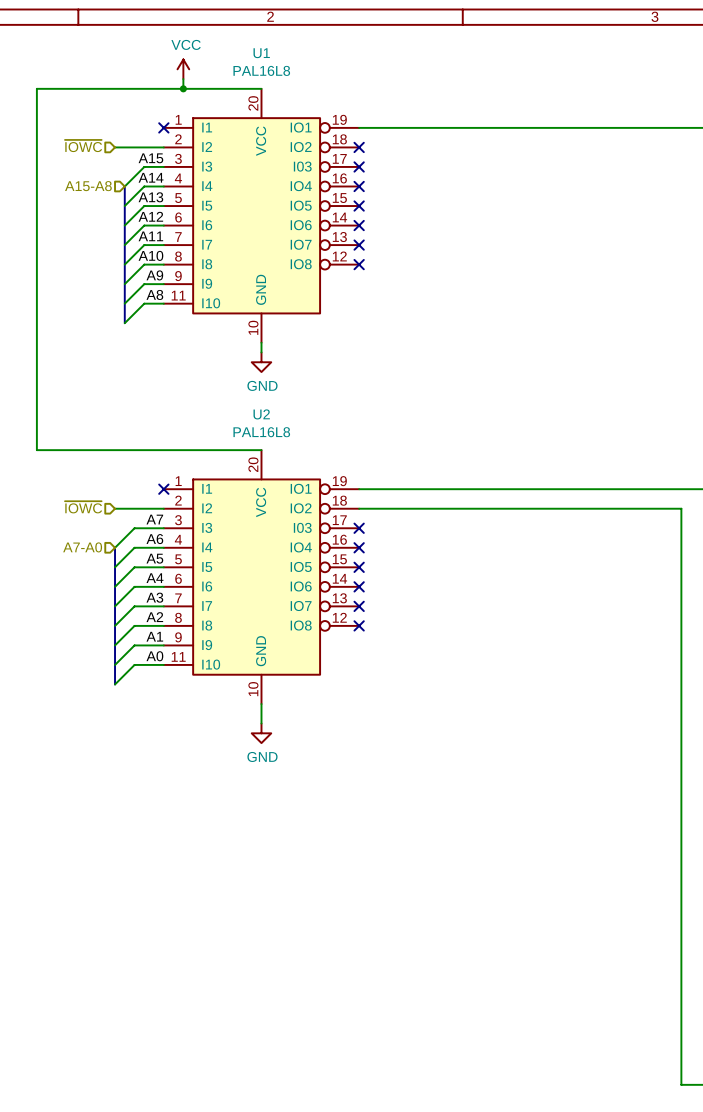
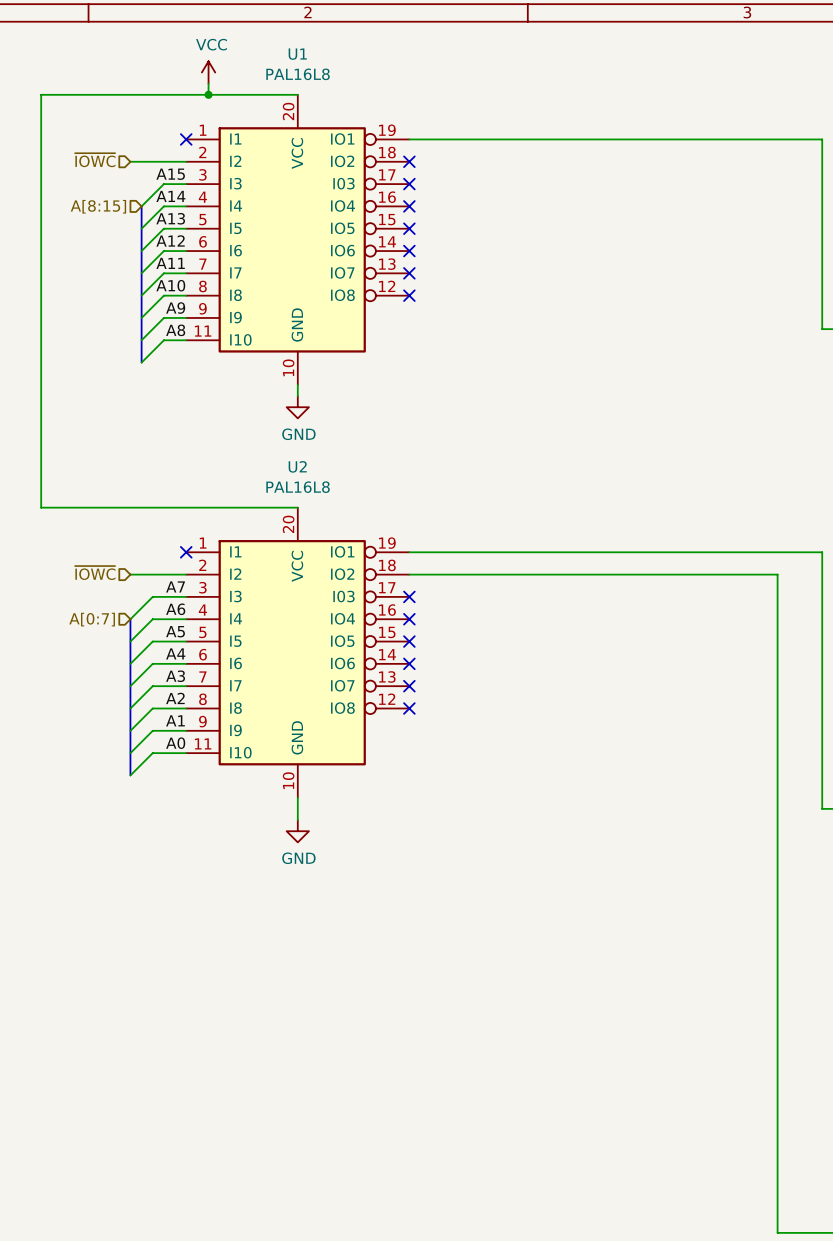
hierarchical label: A15-A8 (88, 186) -> A[8:15] (98, 206)
hierarchical label: A7-A0 (82, 547) -> A[0:7] (92, 619)

